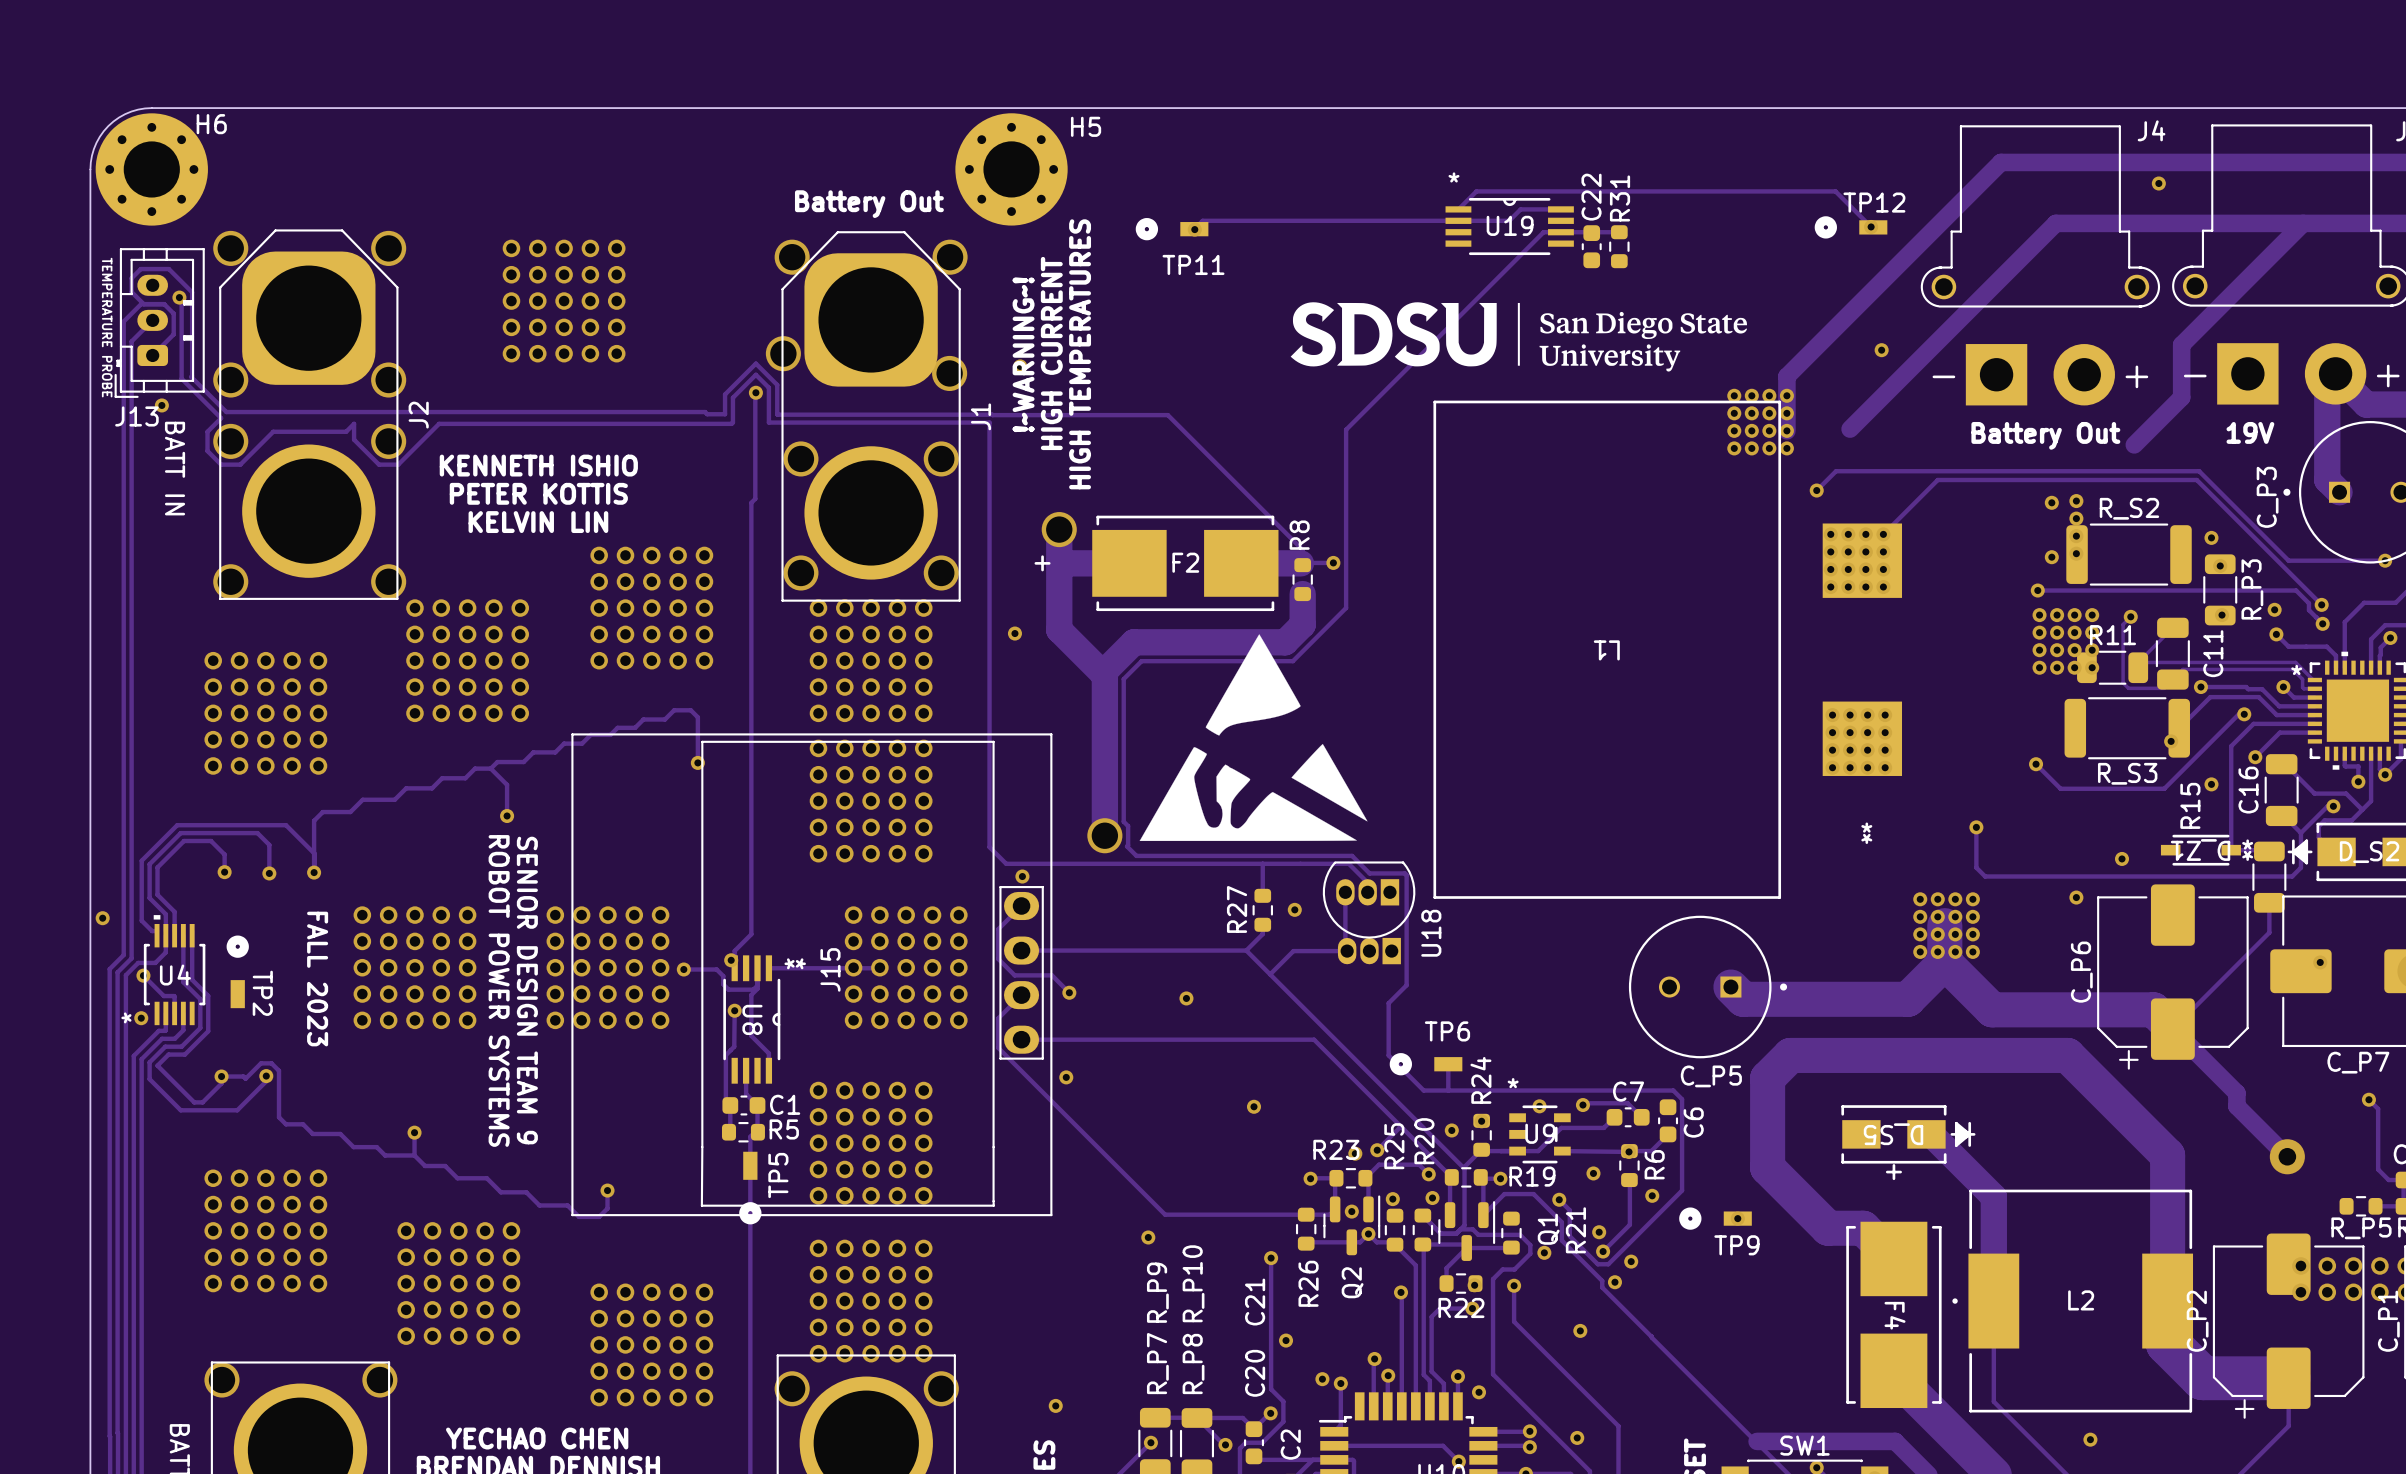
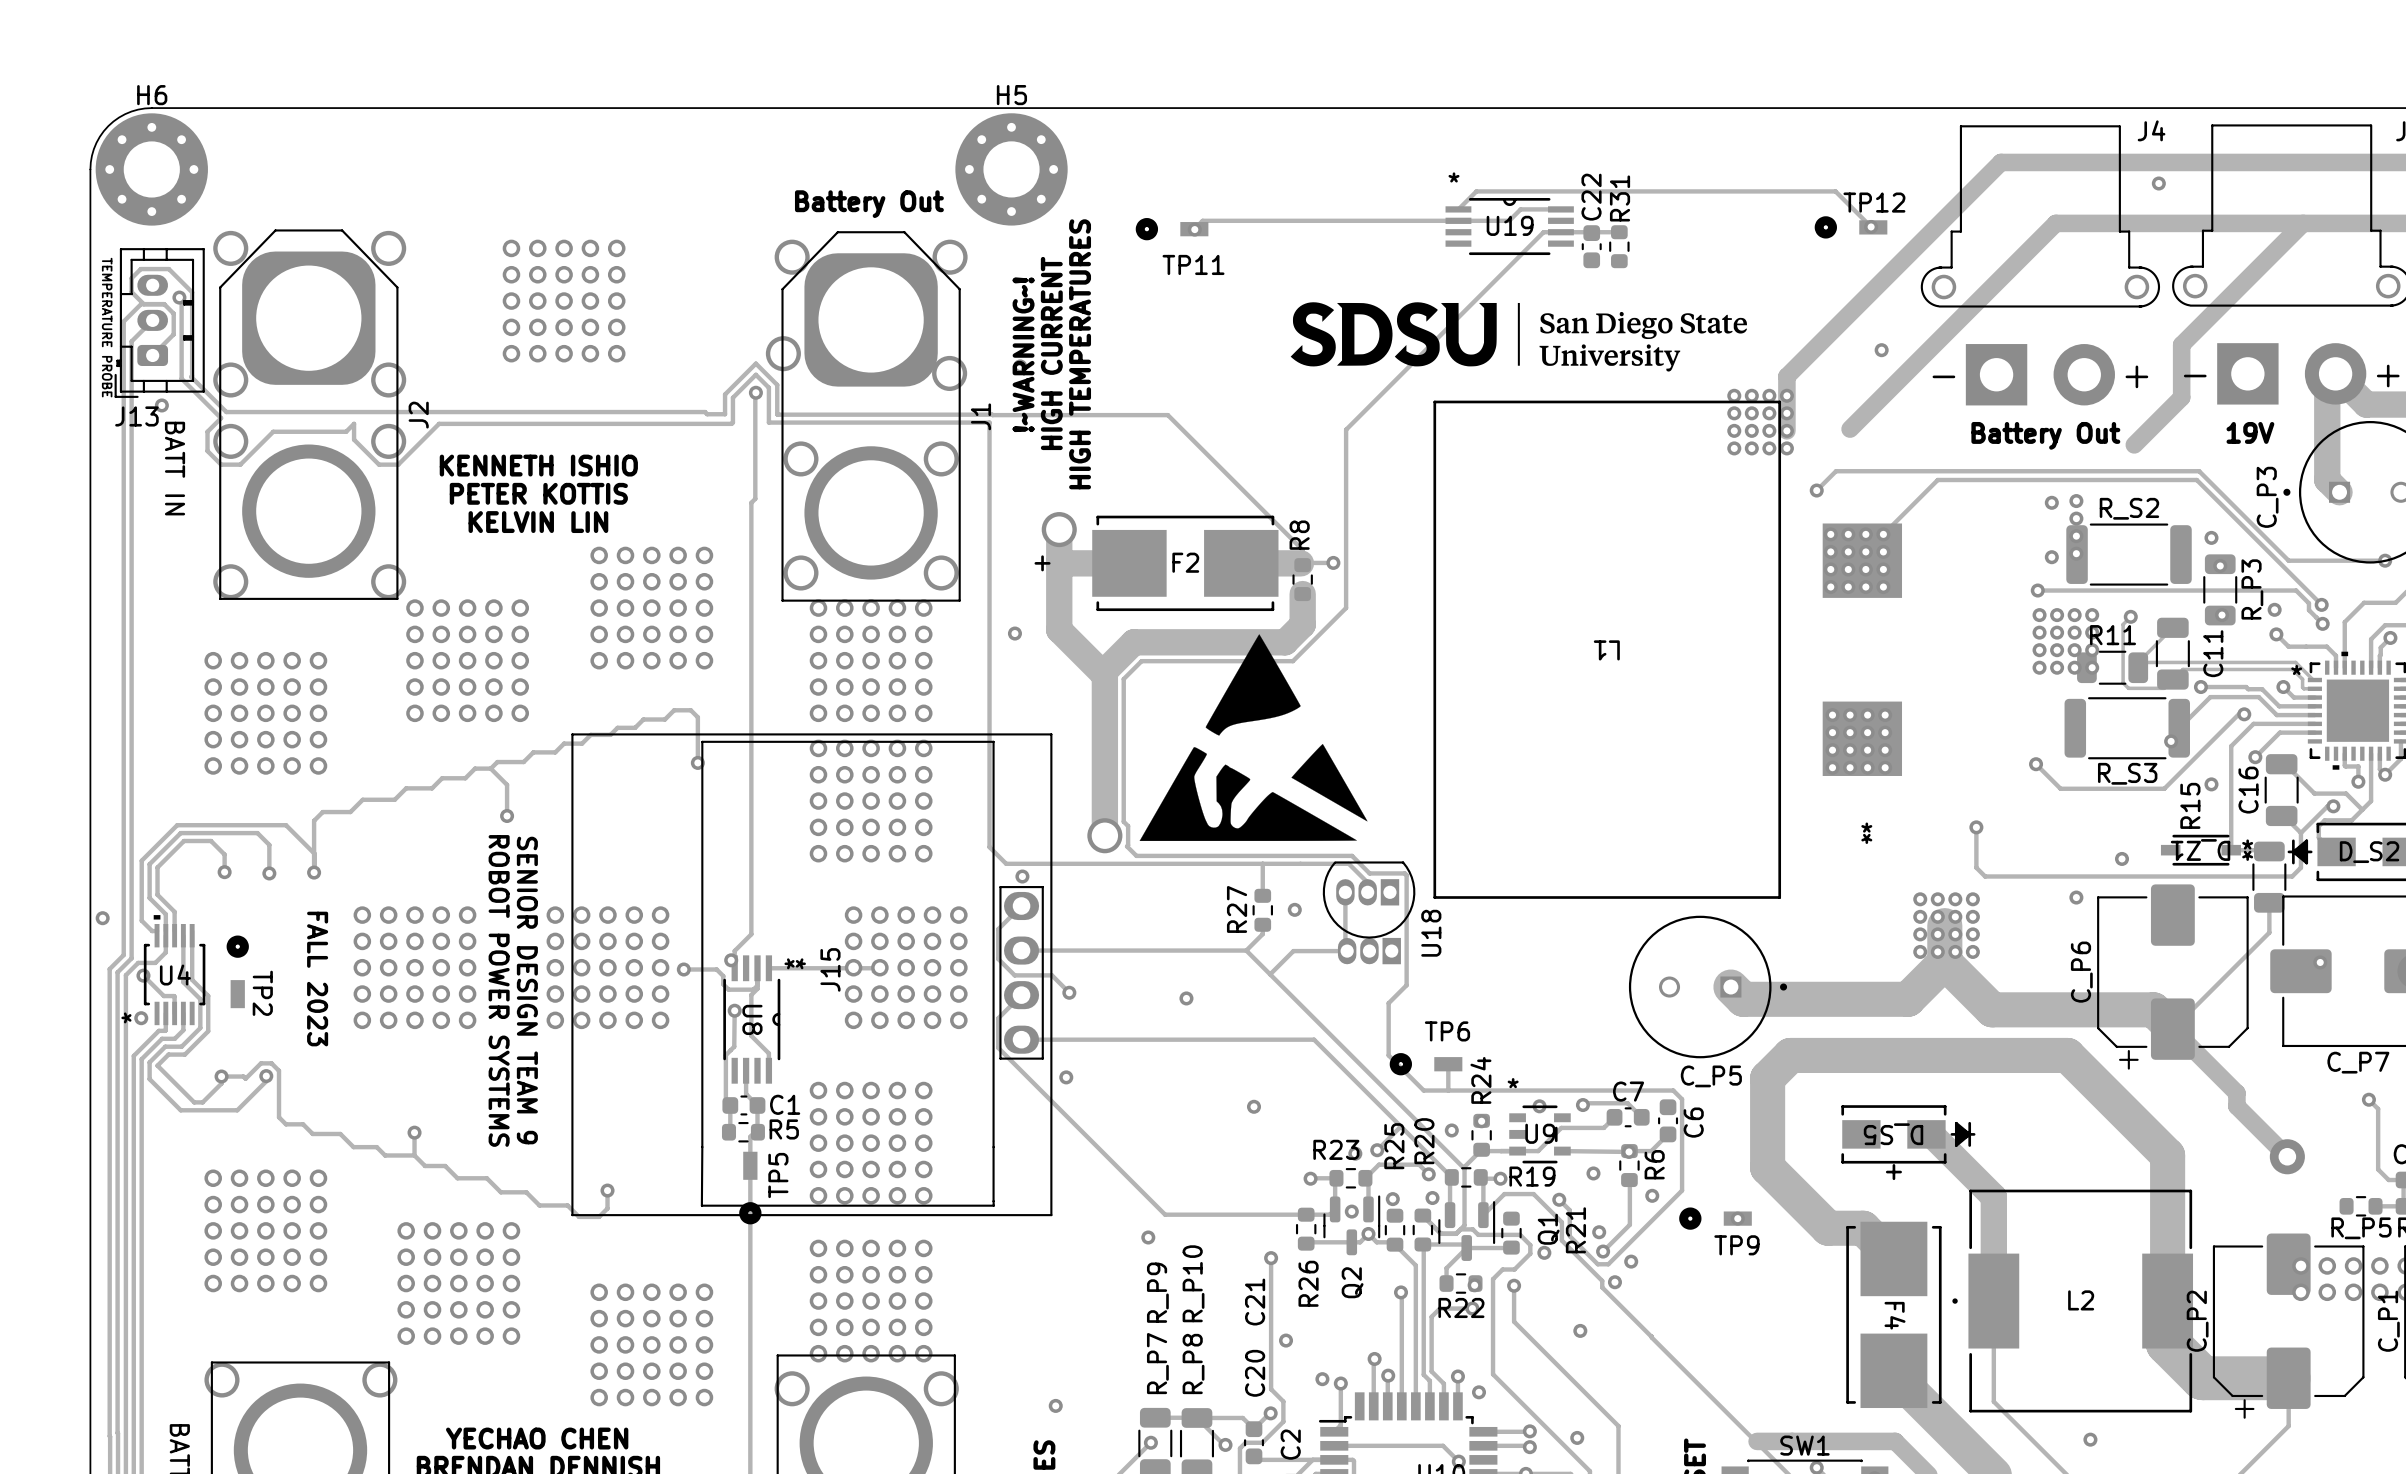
H6 name position: H6 (211, 124) -> H6 (152, 95)
H5 name position: H5 (1086, 126) -> H5 (1011, 95)

